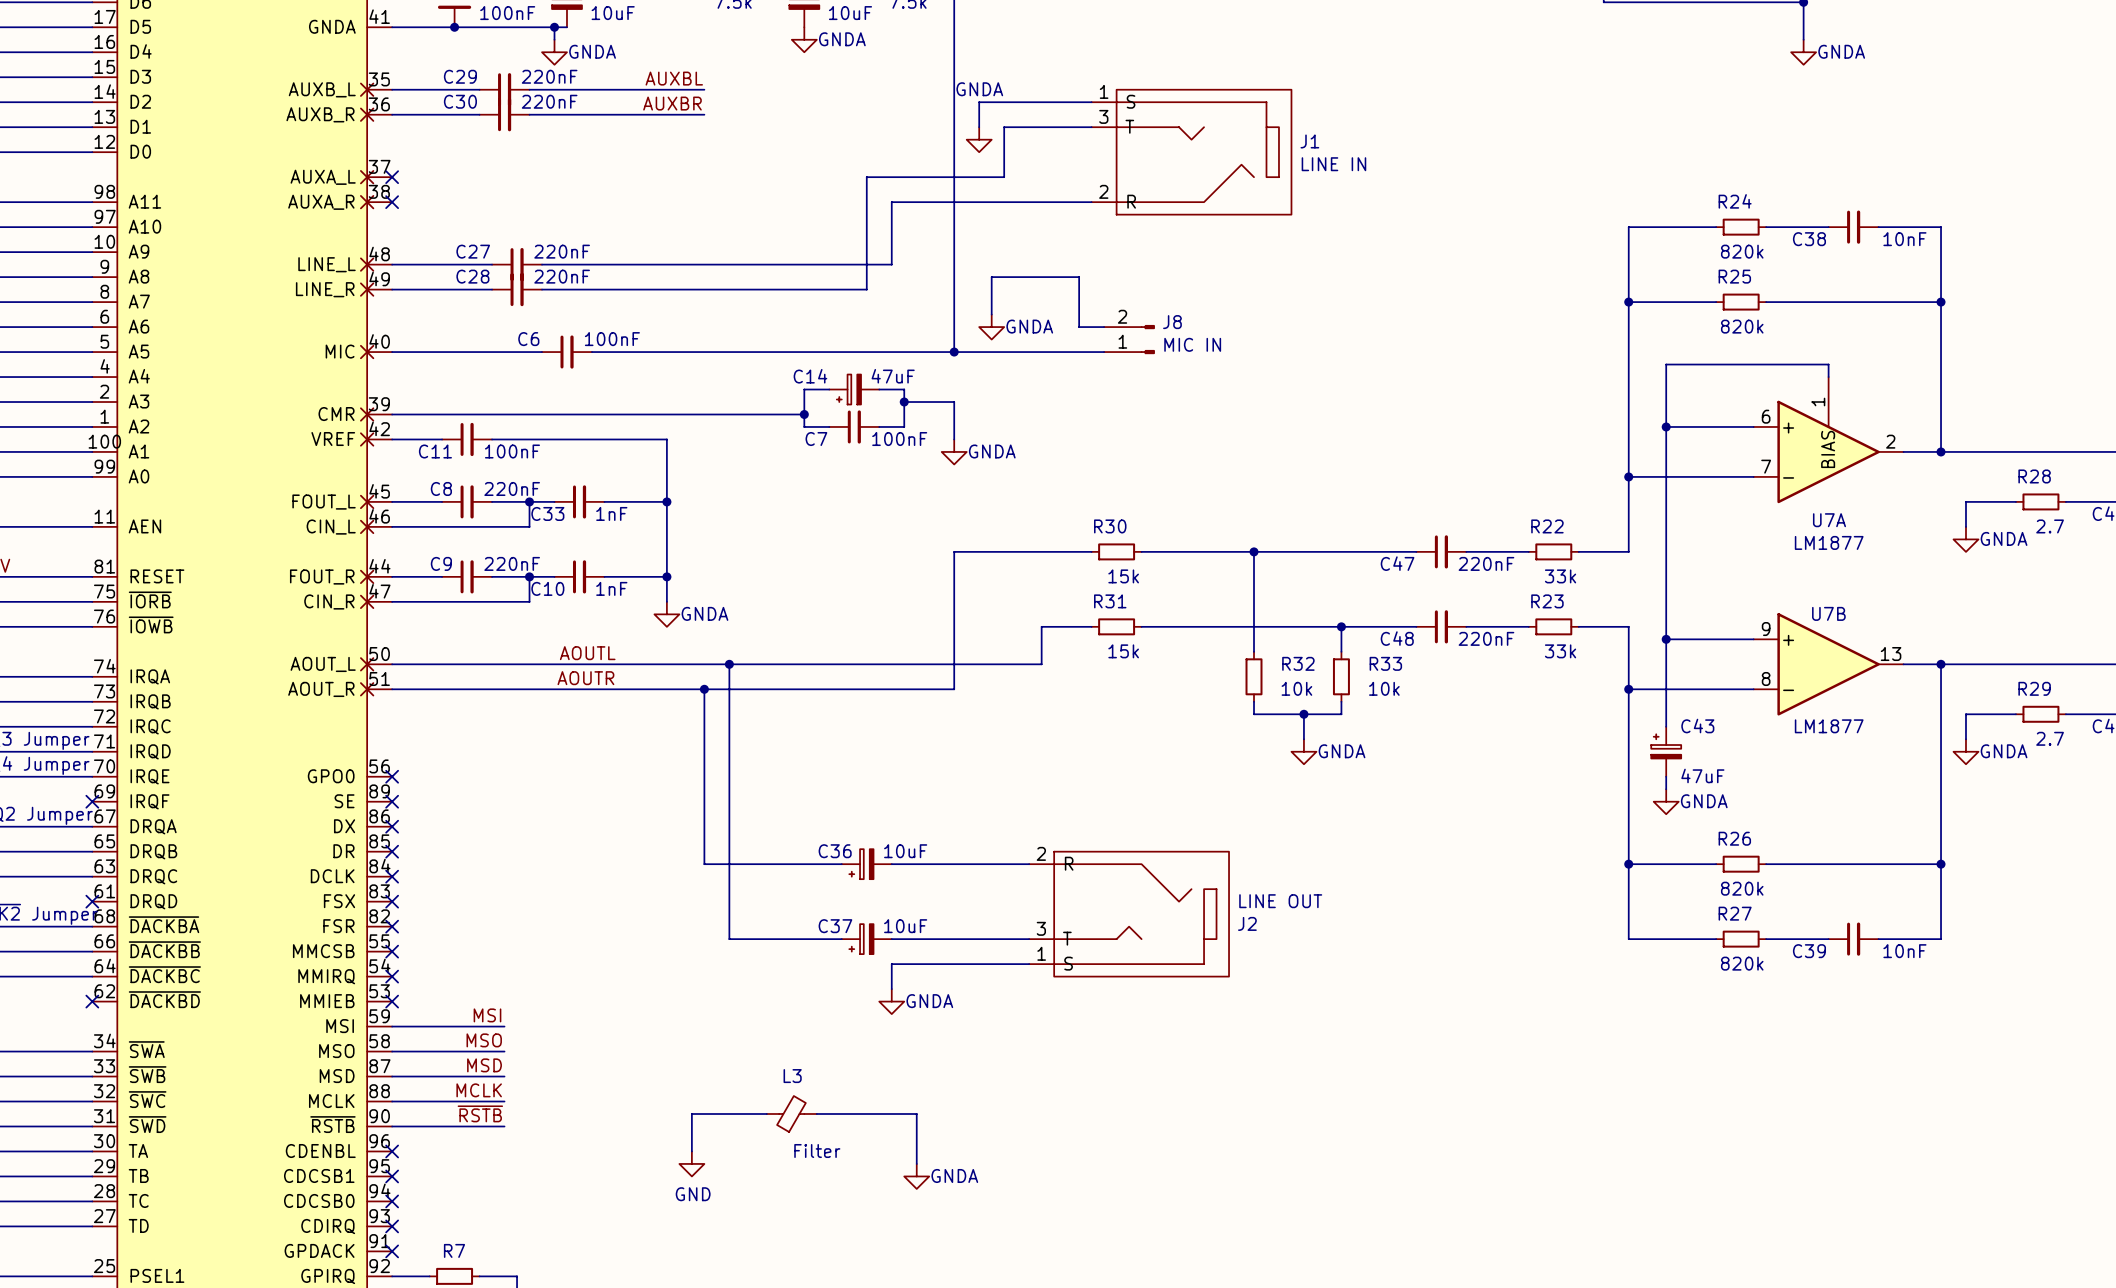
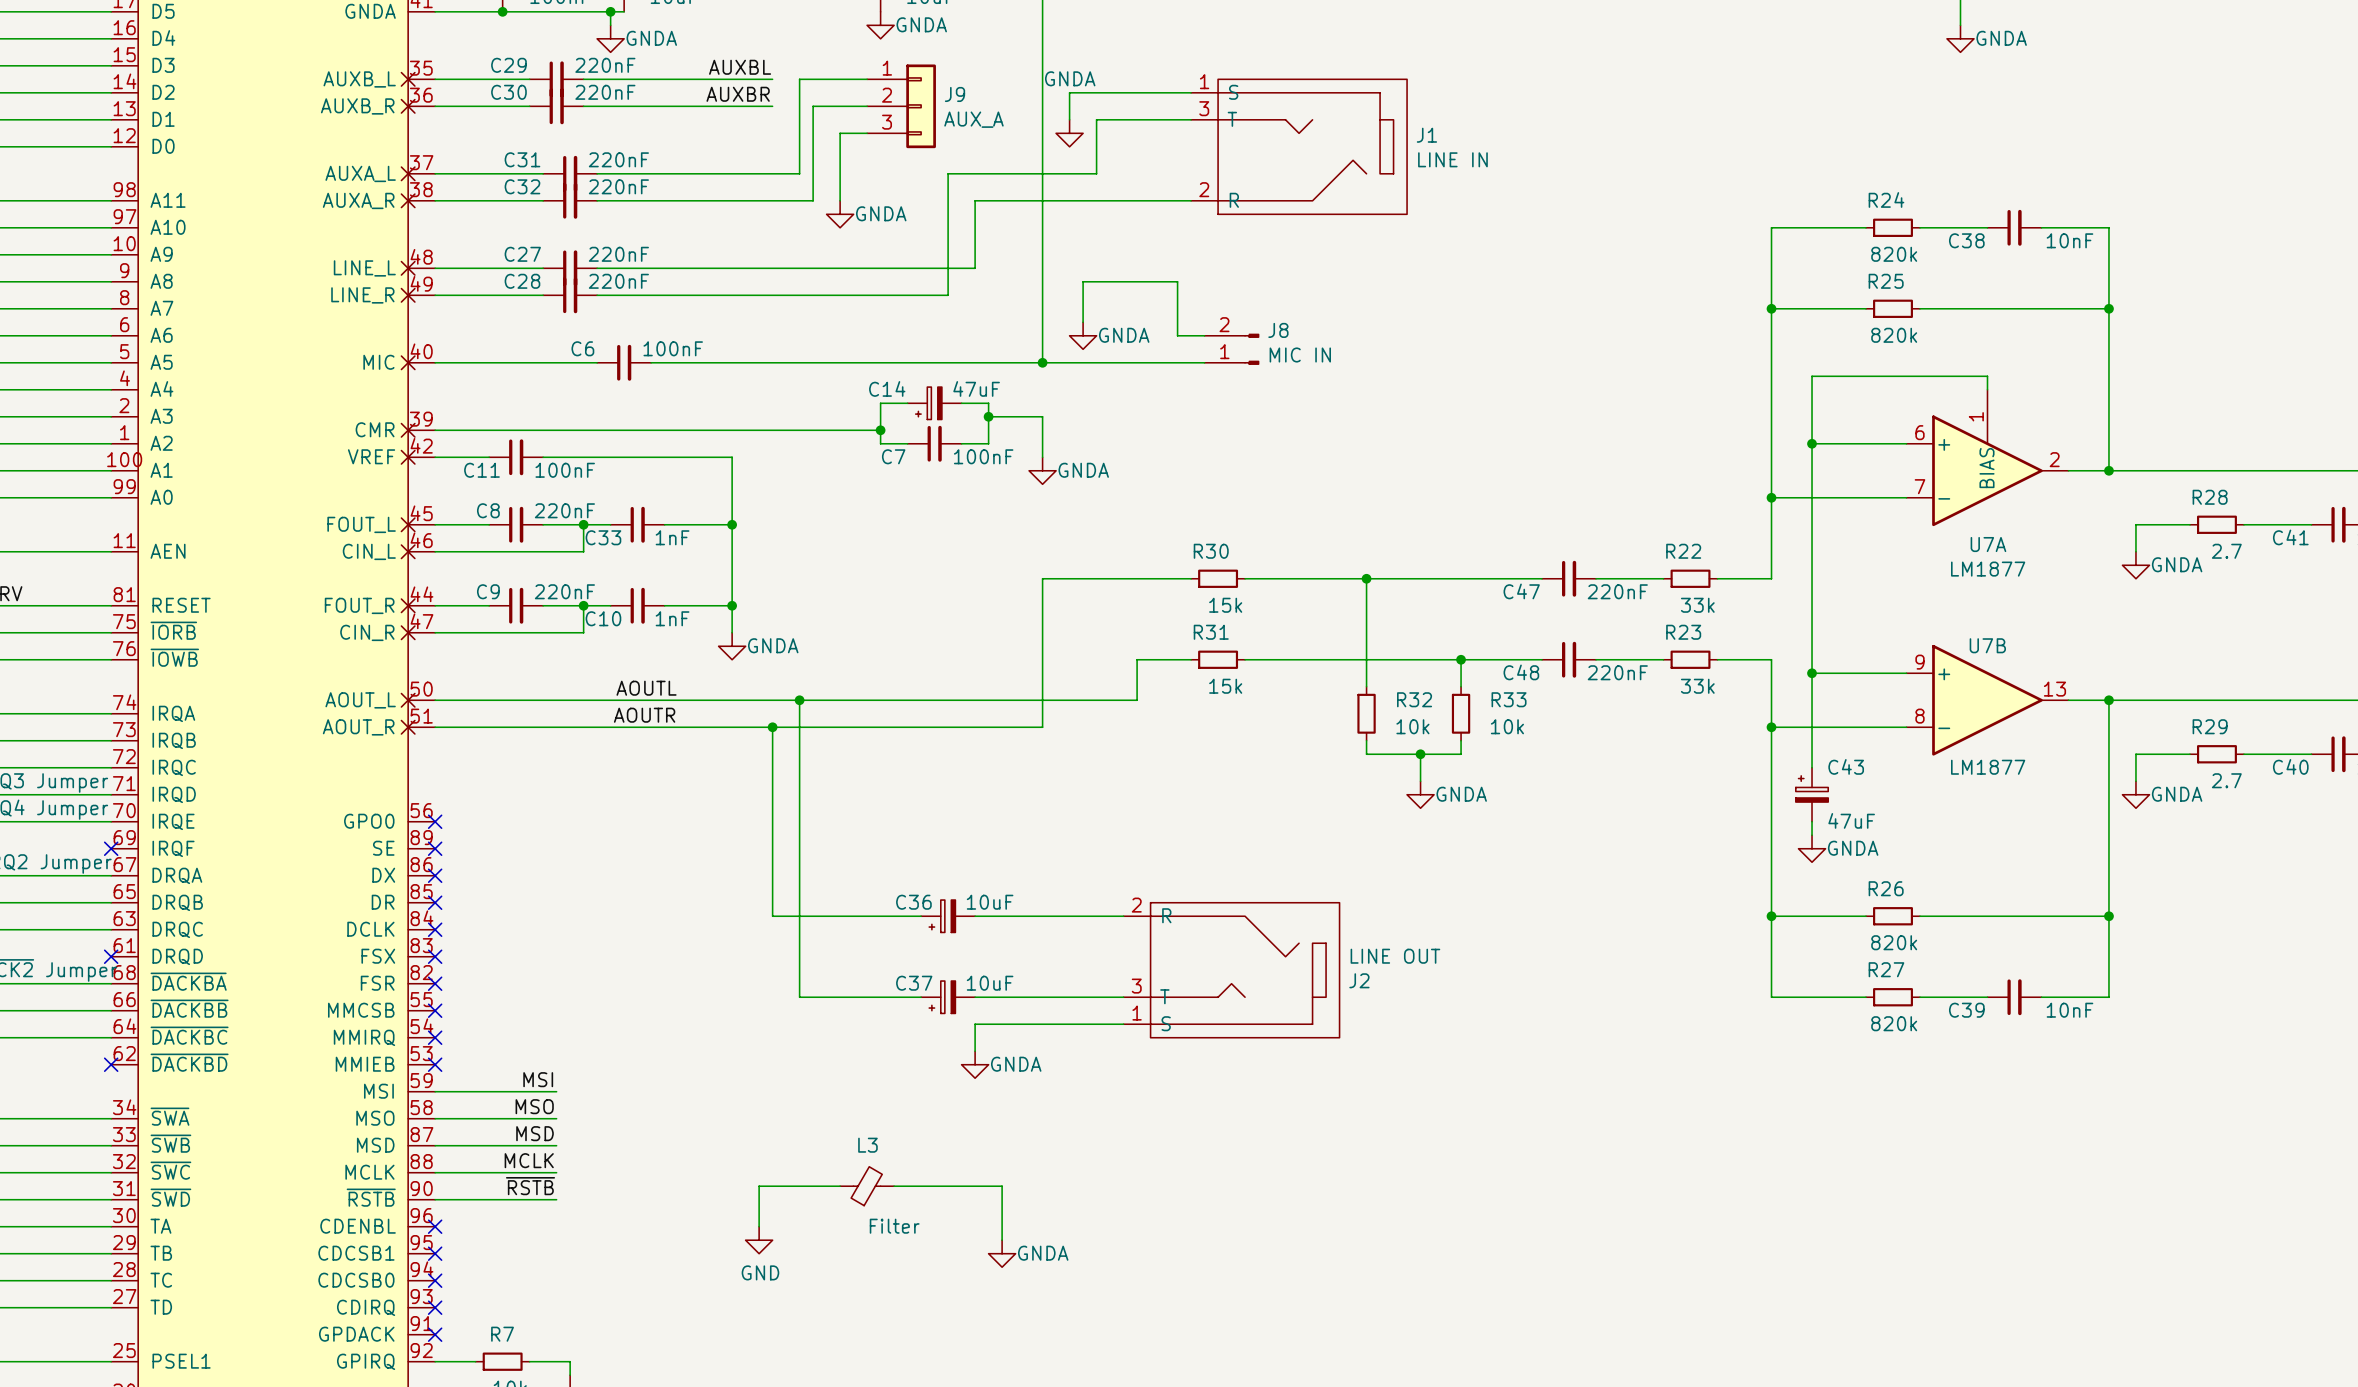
wire: none -> (867, 79) (799, 79) (799, 173) (597, 173)
wire: none -> (867, 106) (813, 106) (813, 200) (597, 200)
J9: none -> AUX_A (901, 106)
wire: none -> (867, 133) (840, 133) (840, 200)
wire: none -> (435, 173) (543, 173)
no-connect mark: (392, 177) -> none
C31: none -> 220nF (570, 173)
wire: none -> (435, 200) (543, 200)
no-connect mark: (392, 202) -> none
C32: none -> 220nF (570, 200)
power symbol: none -> GNDA (840, 214)

